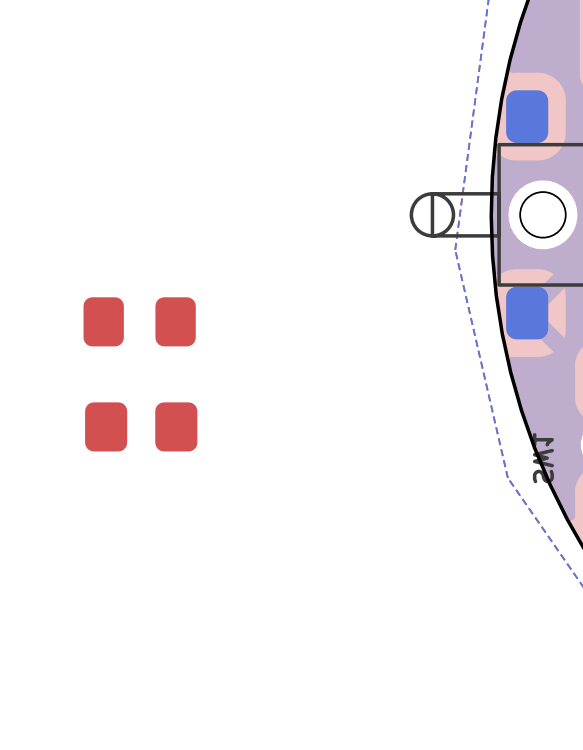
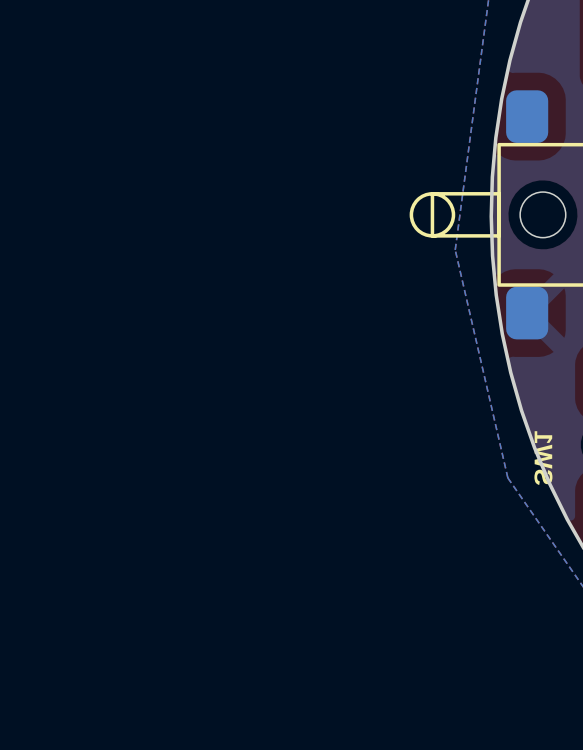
part: (139, 321) -> none
part: (141, 426) -> none

